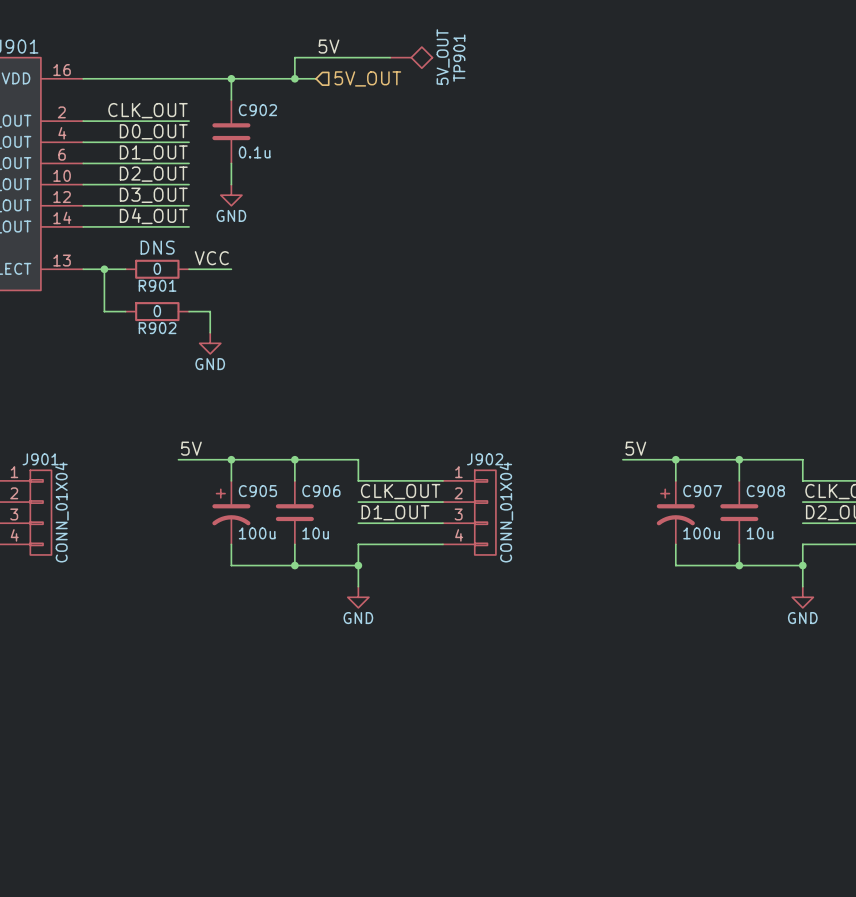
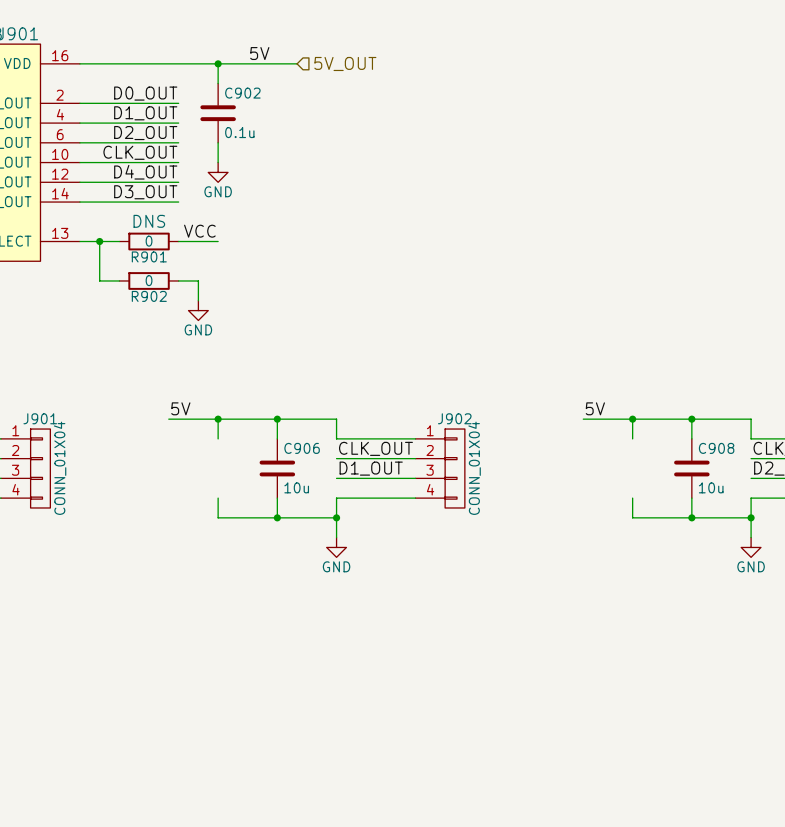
label position: 5V (328, 46) -> 5V (259, 53)
wire: (390, 57) (294, 57) (294, 78) -> none
TP901: 5V_OUT (411, 57) -> none
junction: (294, 78) -> none
label: CLK_OUT (148, 110) -> D0_OUT (145, 93)
label: D0_OUT (153, 131) -> D1_OUT (145, 113)
label: D1_OUT (153, 152) -> D2_OUT (145, 133)
label: D2_OUT (153, 174) -> CLK_OUT (140, 152)
label: D3_OUT (153, 195) -> D4_OUT (145, 172)
label: D4_OUT (153, 216) -> D3_OUT (145, 192)
C905: 100u (231, 512) -> none
C907: 100u (675, 512) -> none

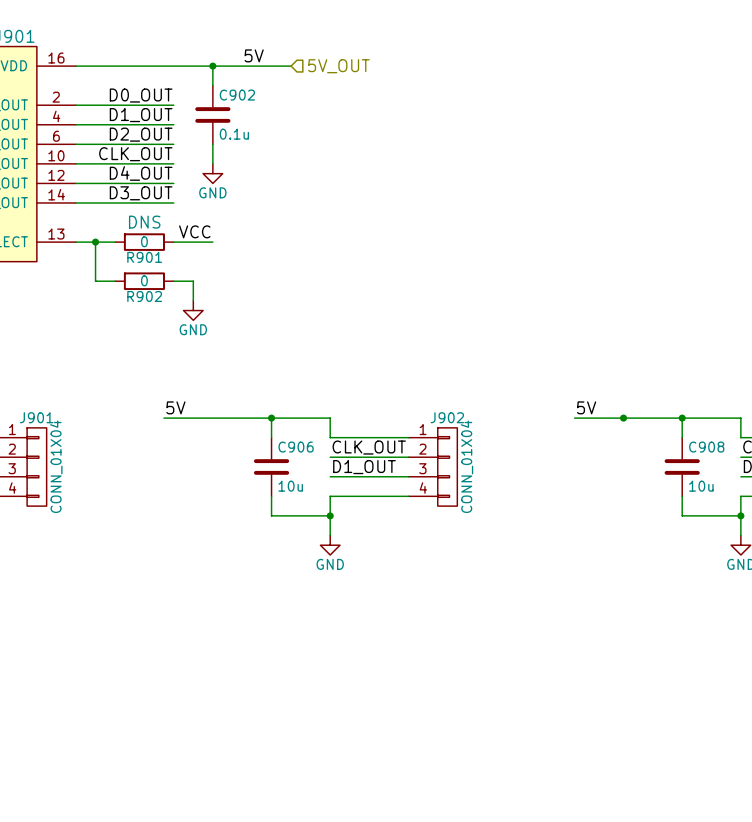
wire: (218, 419) (218, 438) -> none
junction: (218, 419) -> none
wire: (632, 419) (632, 438) -> none
wire: (218, 498) (218, 517) (277, 517) -> none
wire: (632, 498) (632, 517) (691, 517) -> none
junction: (277, 517) -> none
junction: (691, 517) -> none

